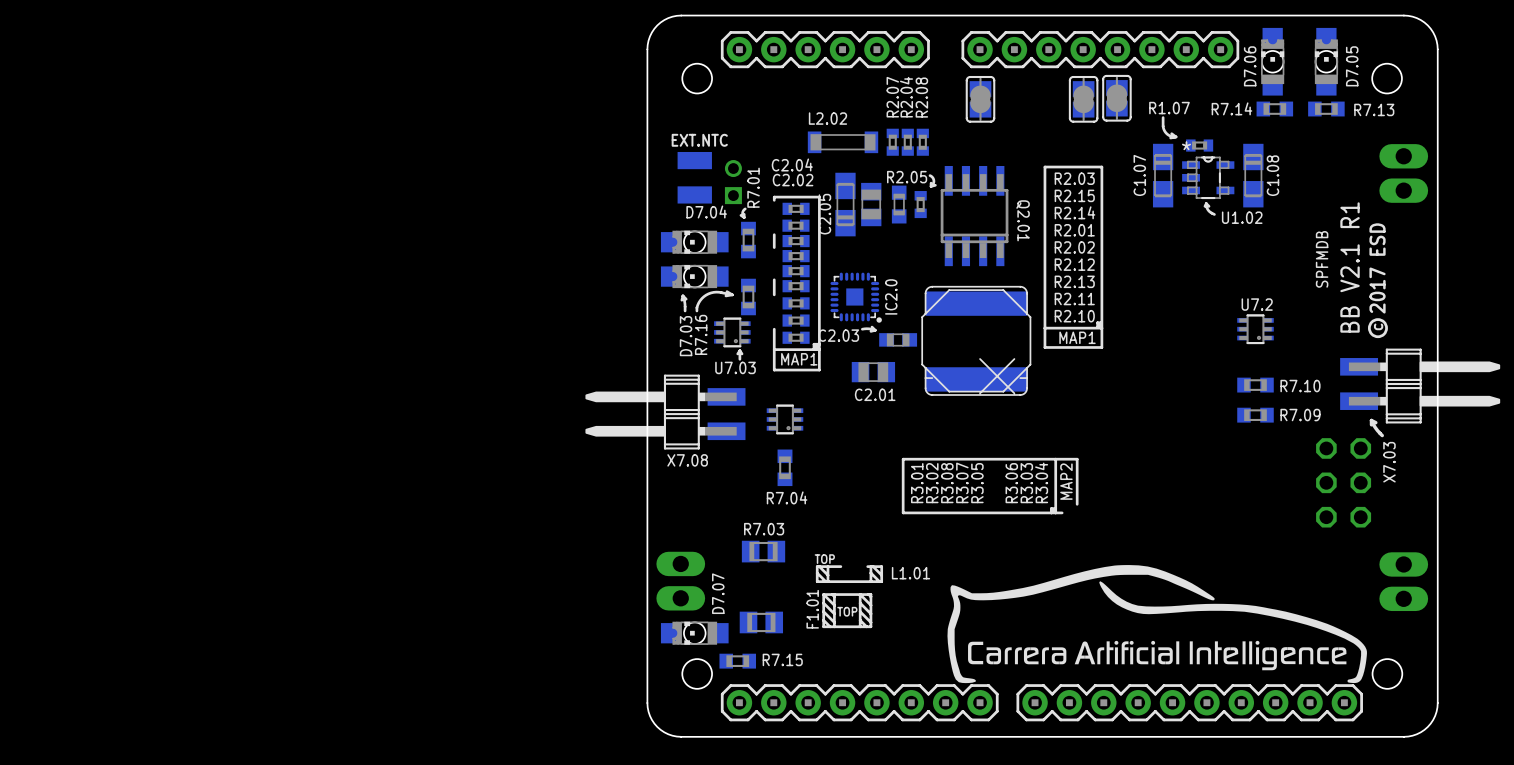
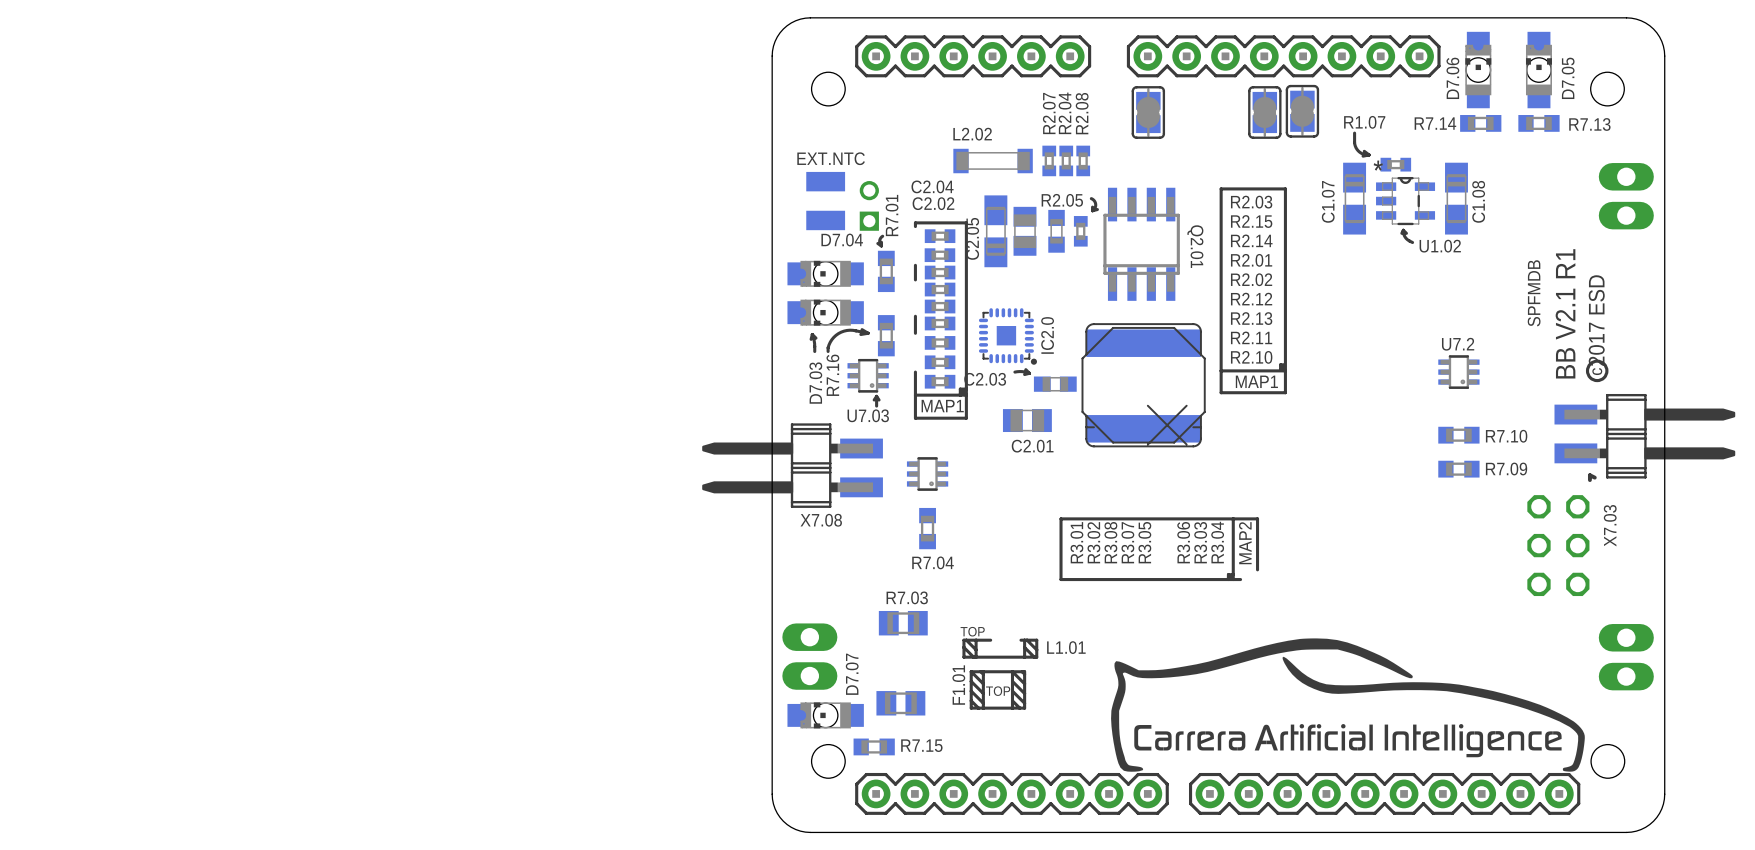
line: (1371, 420) (1382, 435) -> none

